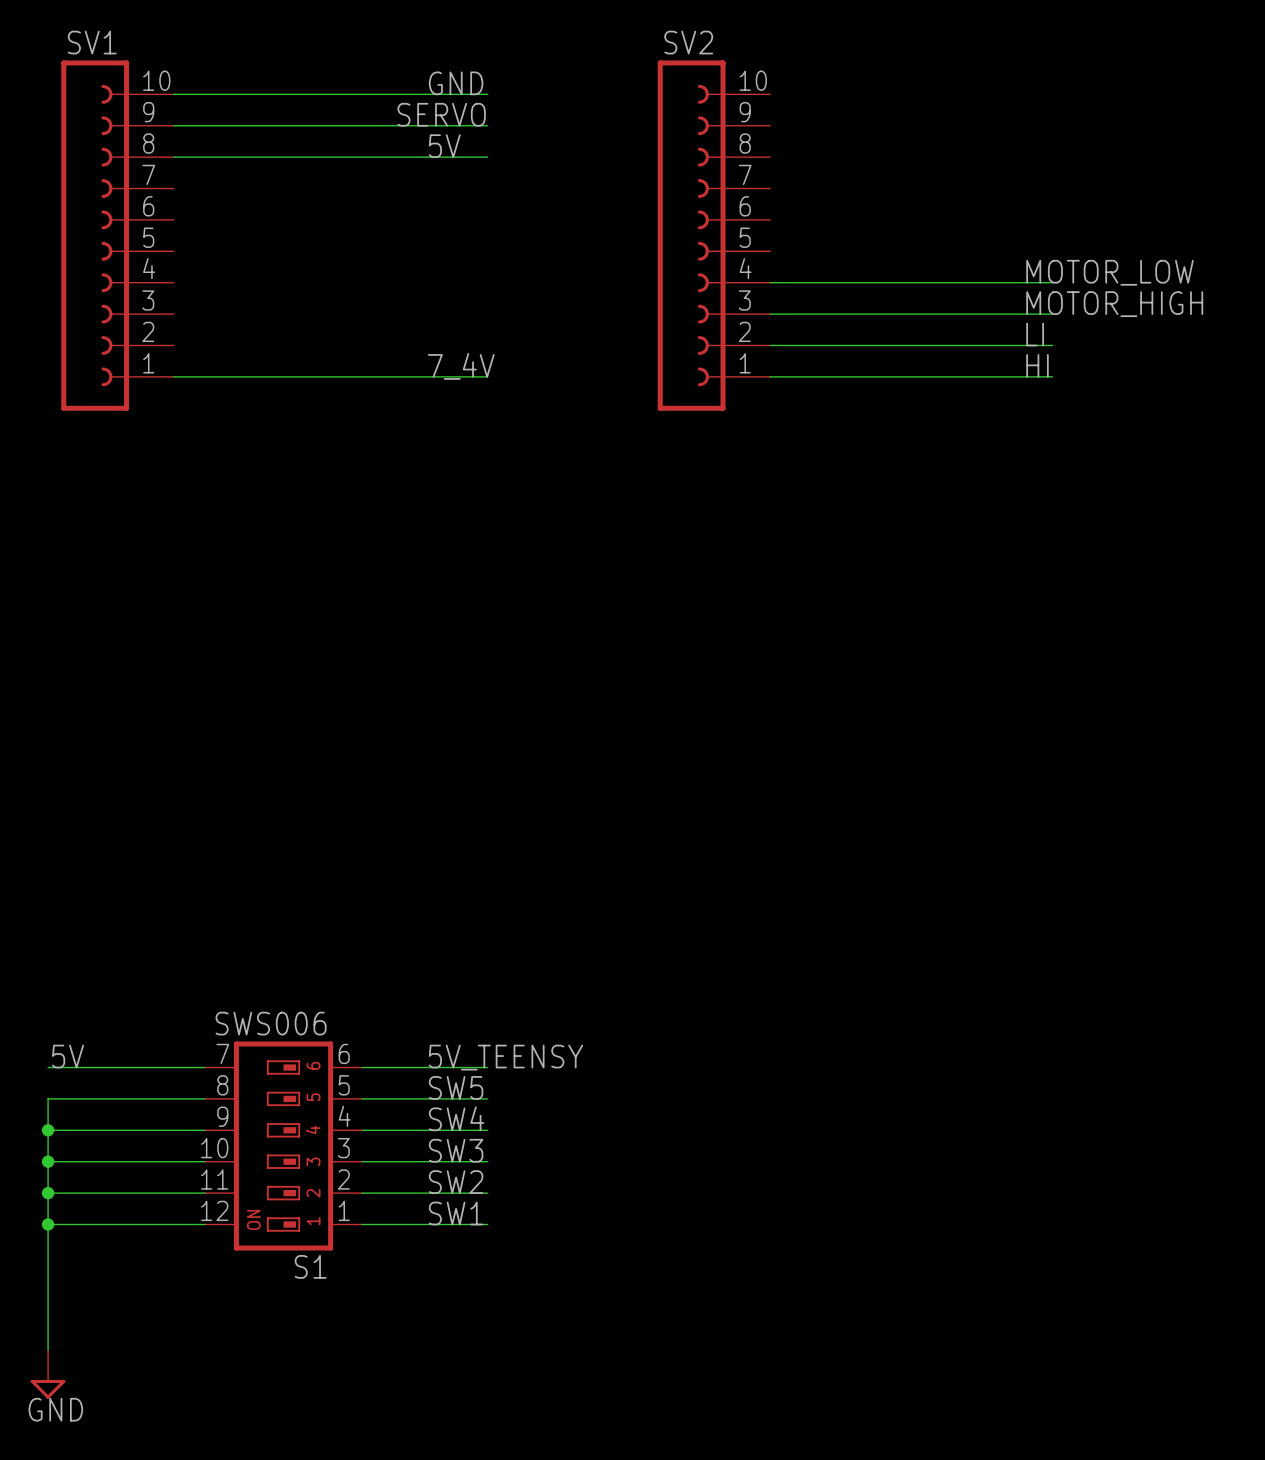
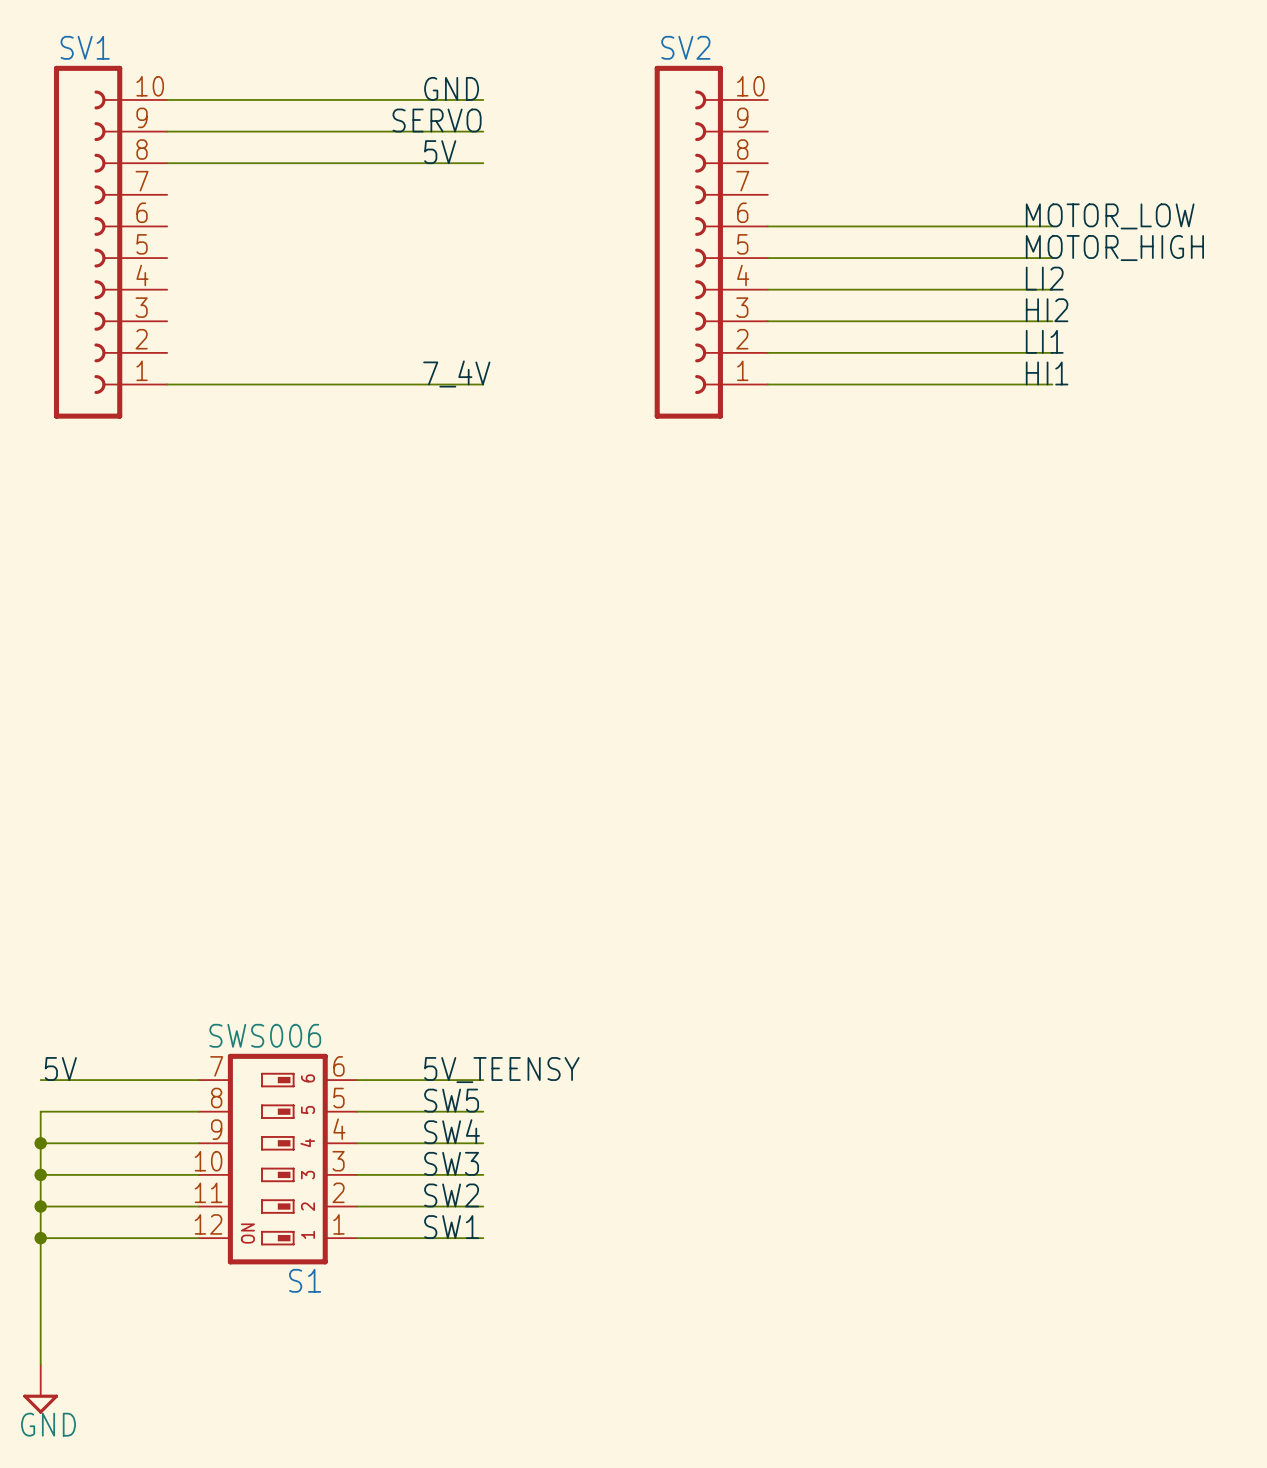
label: none -> MOTOR_LOW (1110, 216)
wire: none -> (767, 226) (1052, 226)
label: none -> MOTOR_HIGH (1114, 248)
wire: none -> (767, 258) (1052, 258)
label: MOTOR_LOW (1110, 272) -> LI2 (1044, 278)
label: MOTOR_HIGH (1114, 304) -> HI2 (1047, 310)
label: LI (1035, 334) -> LI1 (1044, 341)
label: HI (1037, 365) -> HI1 (1047, 373)

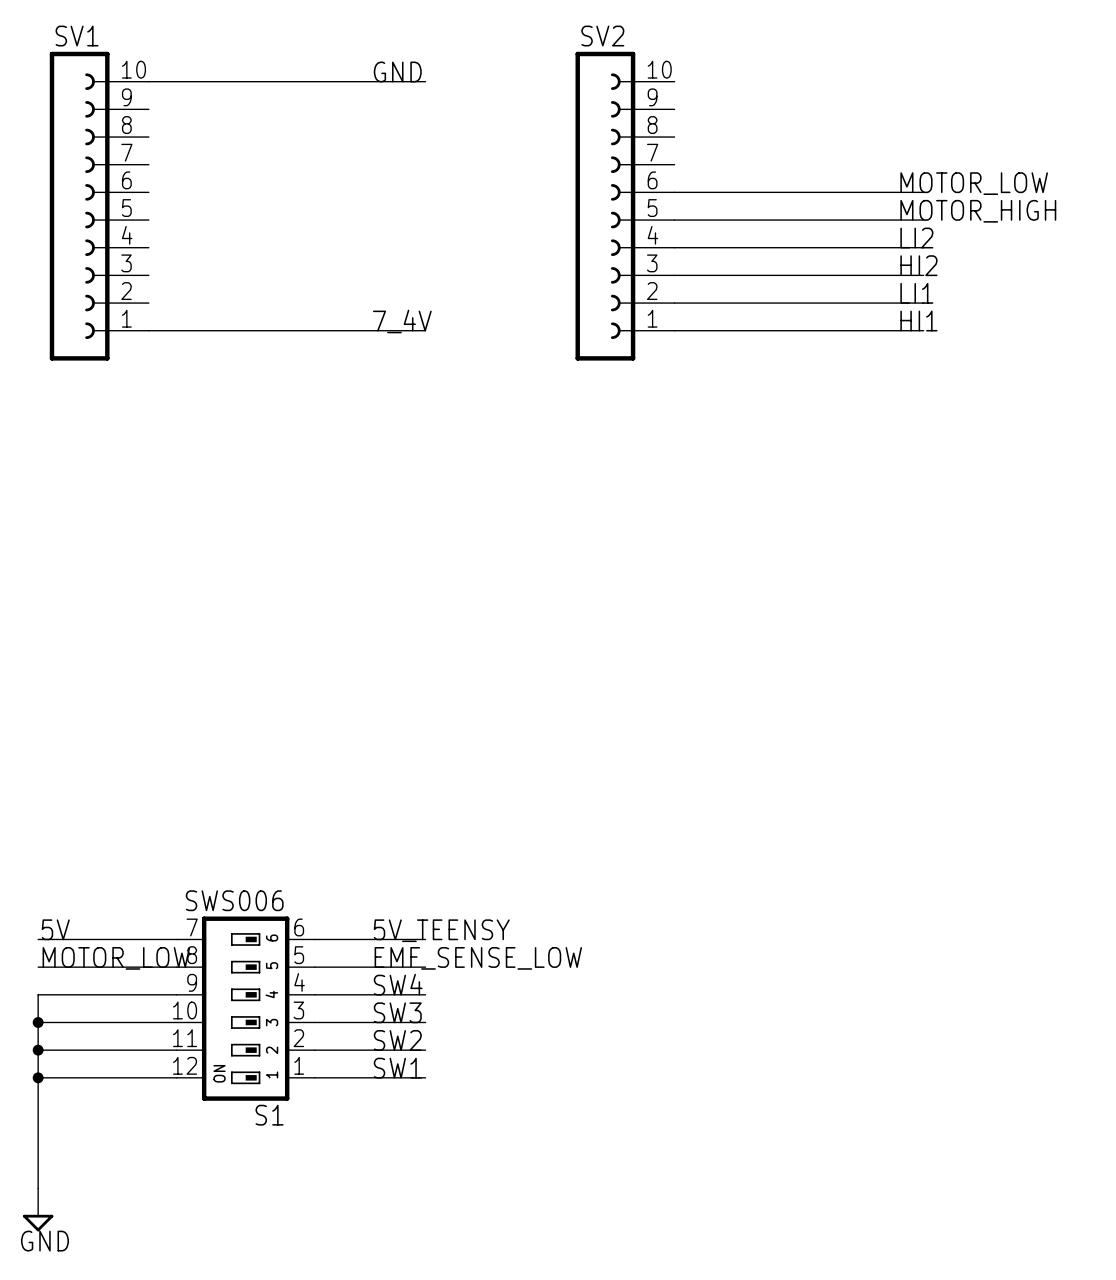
label: SERVO (437, 120) -> none
wire: (167, 131) (483, 131) -> none
label: 5V (440, 152) -> none
wire: (167, 163) (483, 163) -> none
label: SW5 (451, 1100) -> EMF_SENSE_LOW (478, 958)
label: none -> MOTOR_LOW (116, 958)
wire: (40, 1111) (40, 1143) -> none
junction: (40, 1143) -> none

